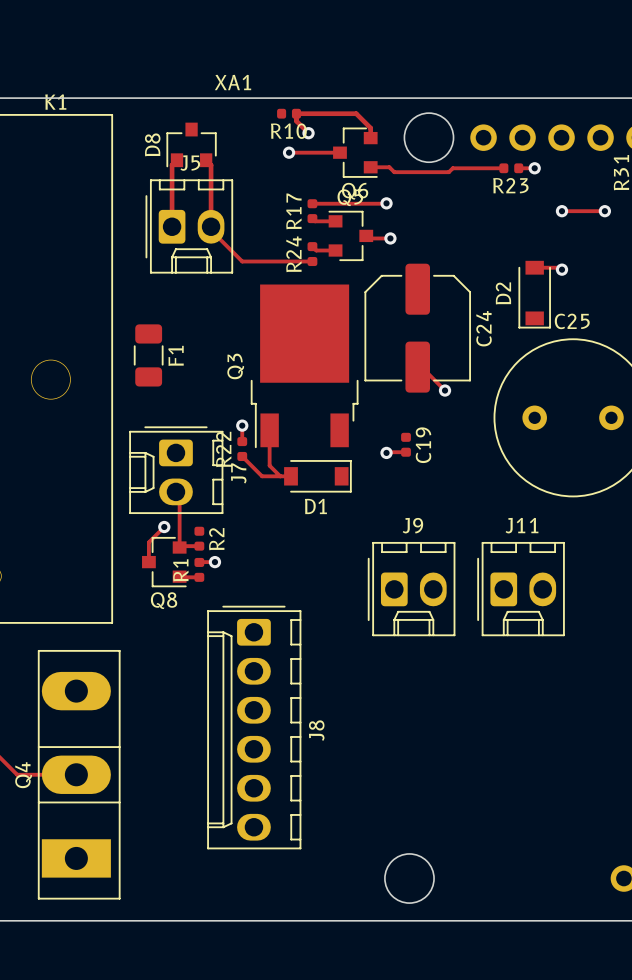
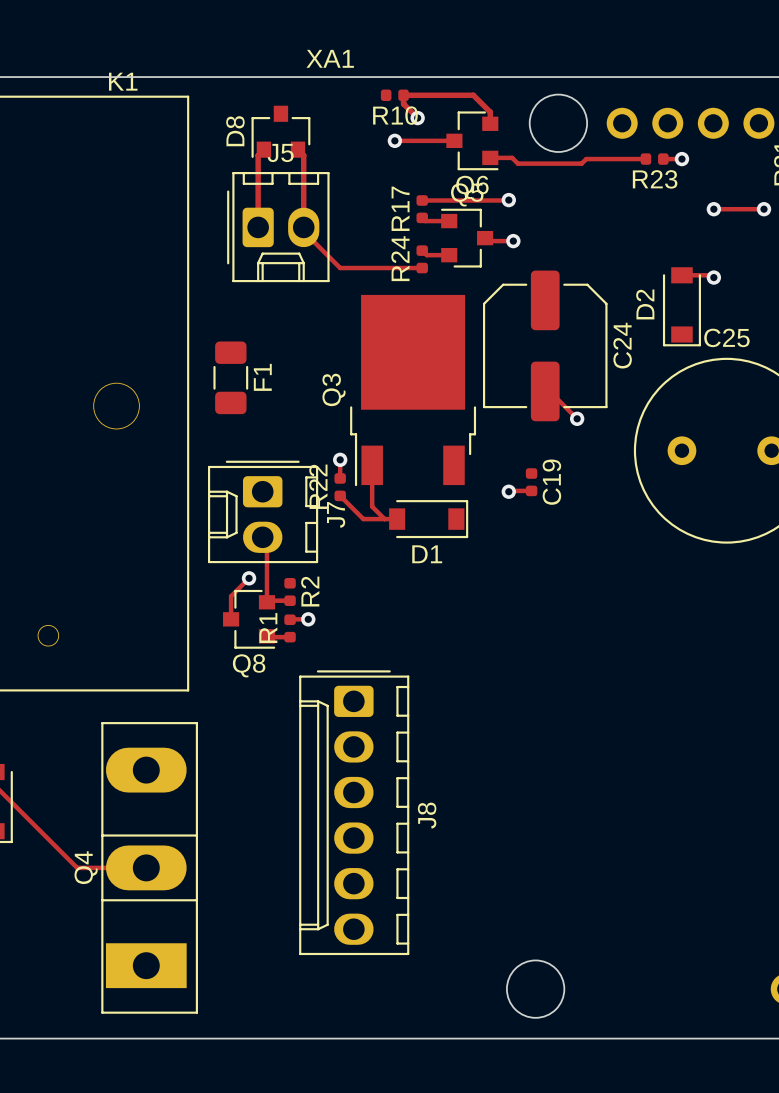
J9: (411, 589) -> none
J11: (521, 589) -> none

